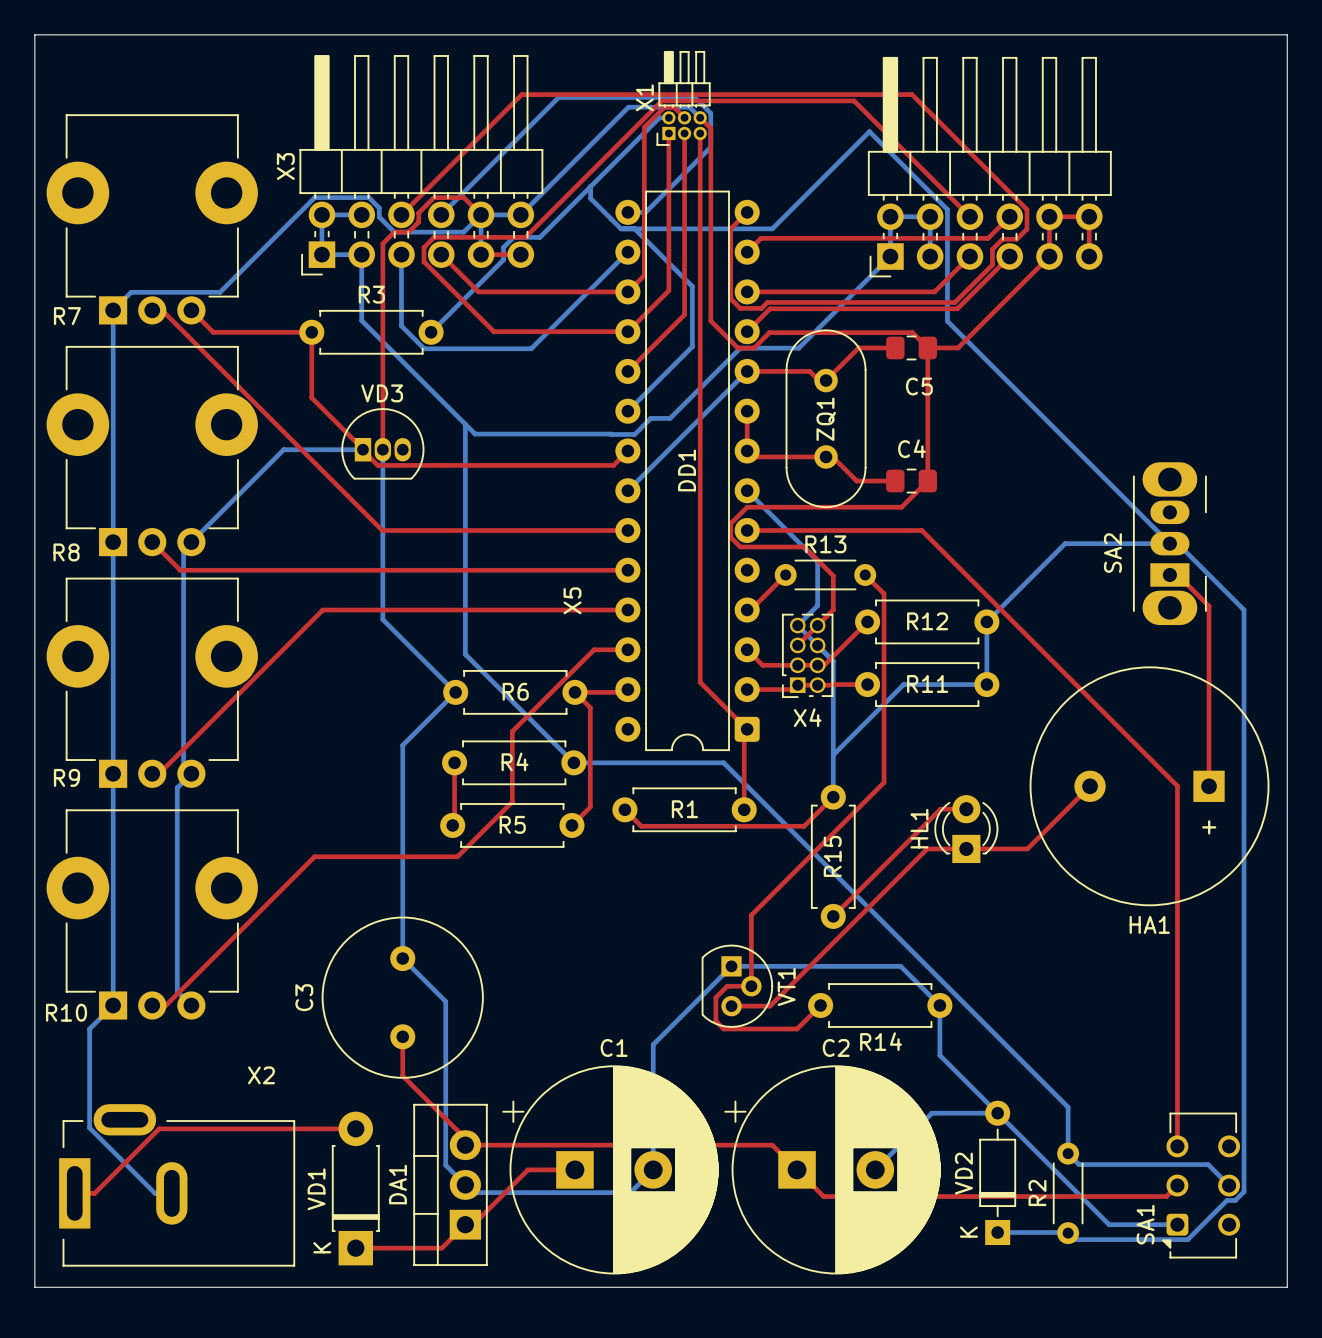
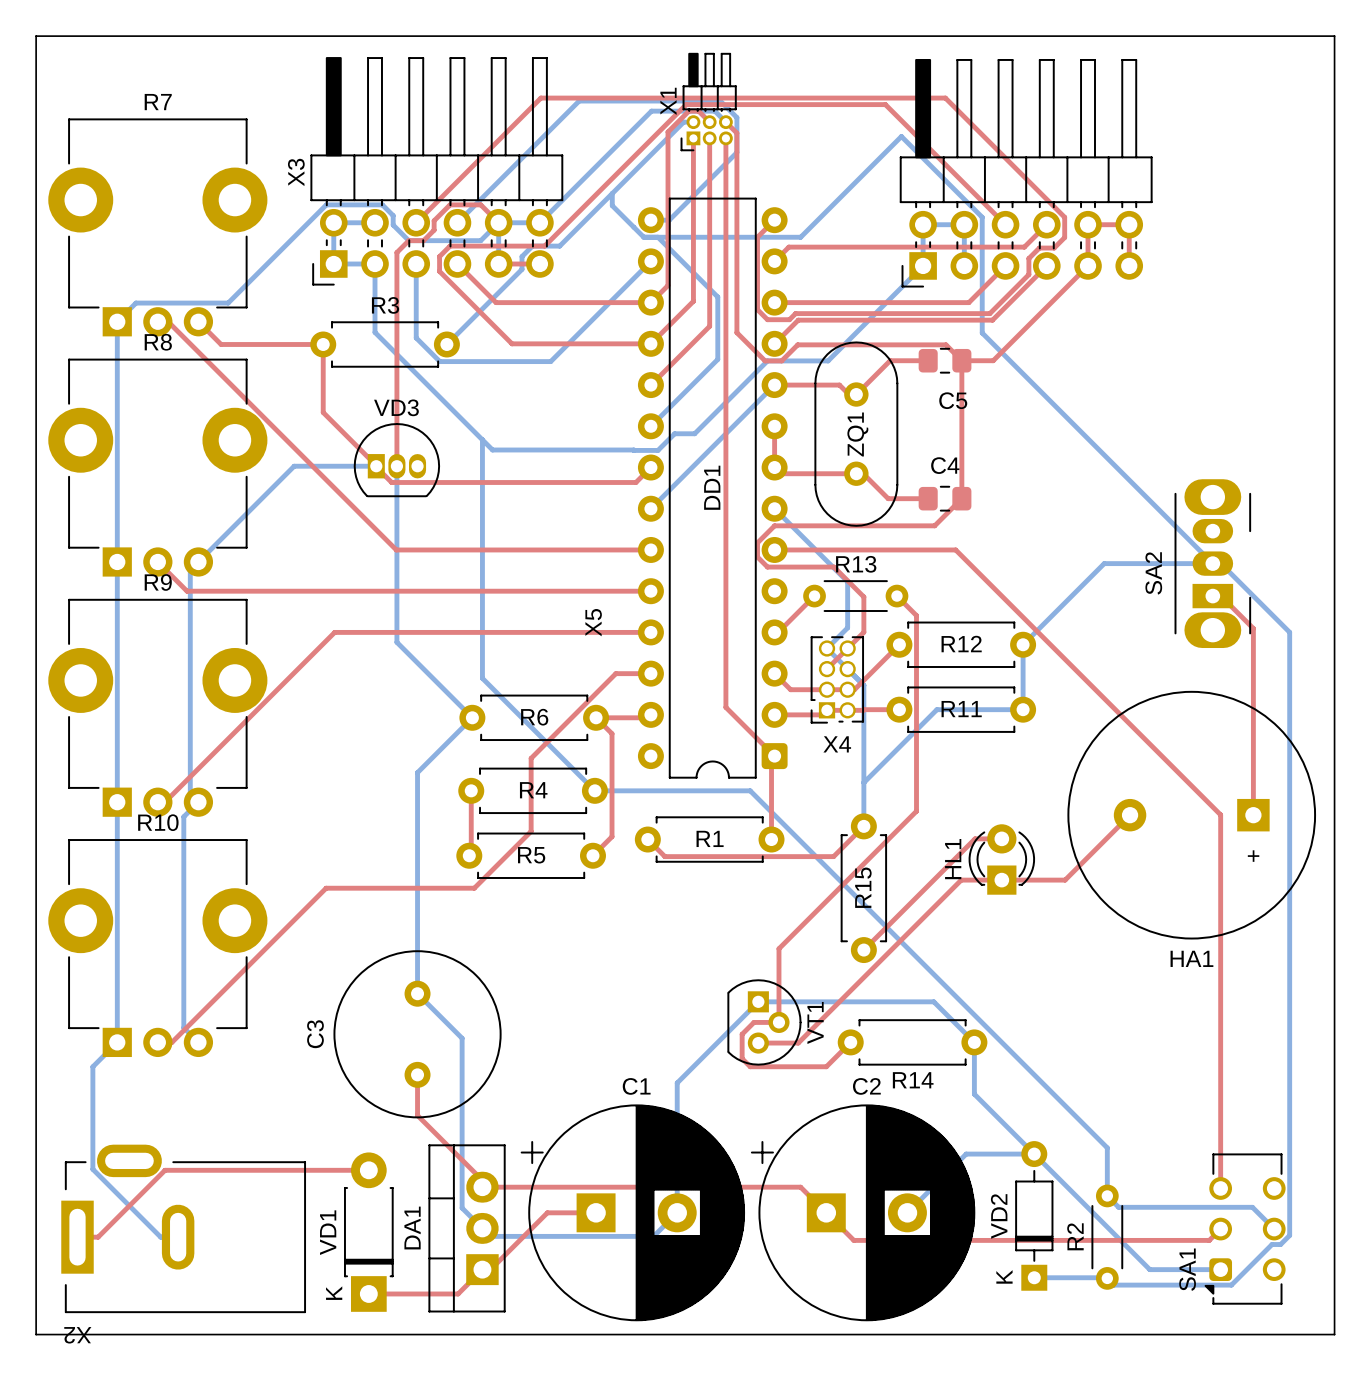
R7 name position: R7 (67, 316) -> R7 (158, 102)
R8 name position: R8 (66, 552) -> R8 (158, 342)
R9 name position: R9 (66, 777) -> R9 (158, 582)
R10 name position: R10 (66, 1012) -> R10 (158, 822)
X2 name rotation: 0° (261, 1075) -> 180° (77, 1335)
X2 name position: X2 (261, 1075) -> X2 (77, 1335)

